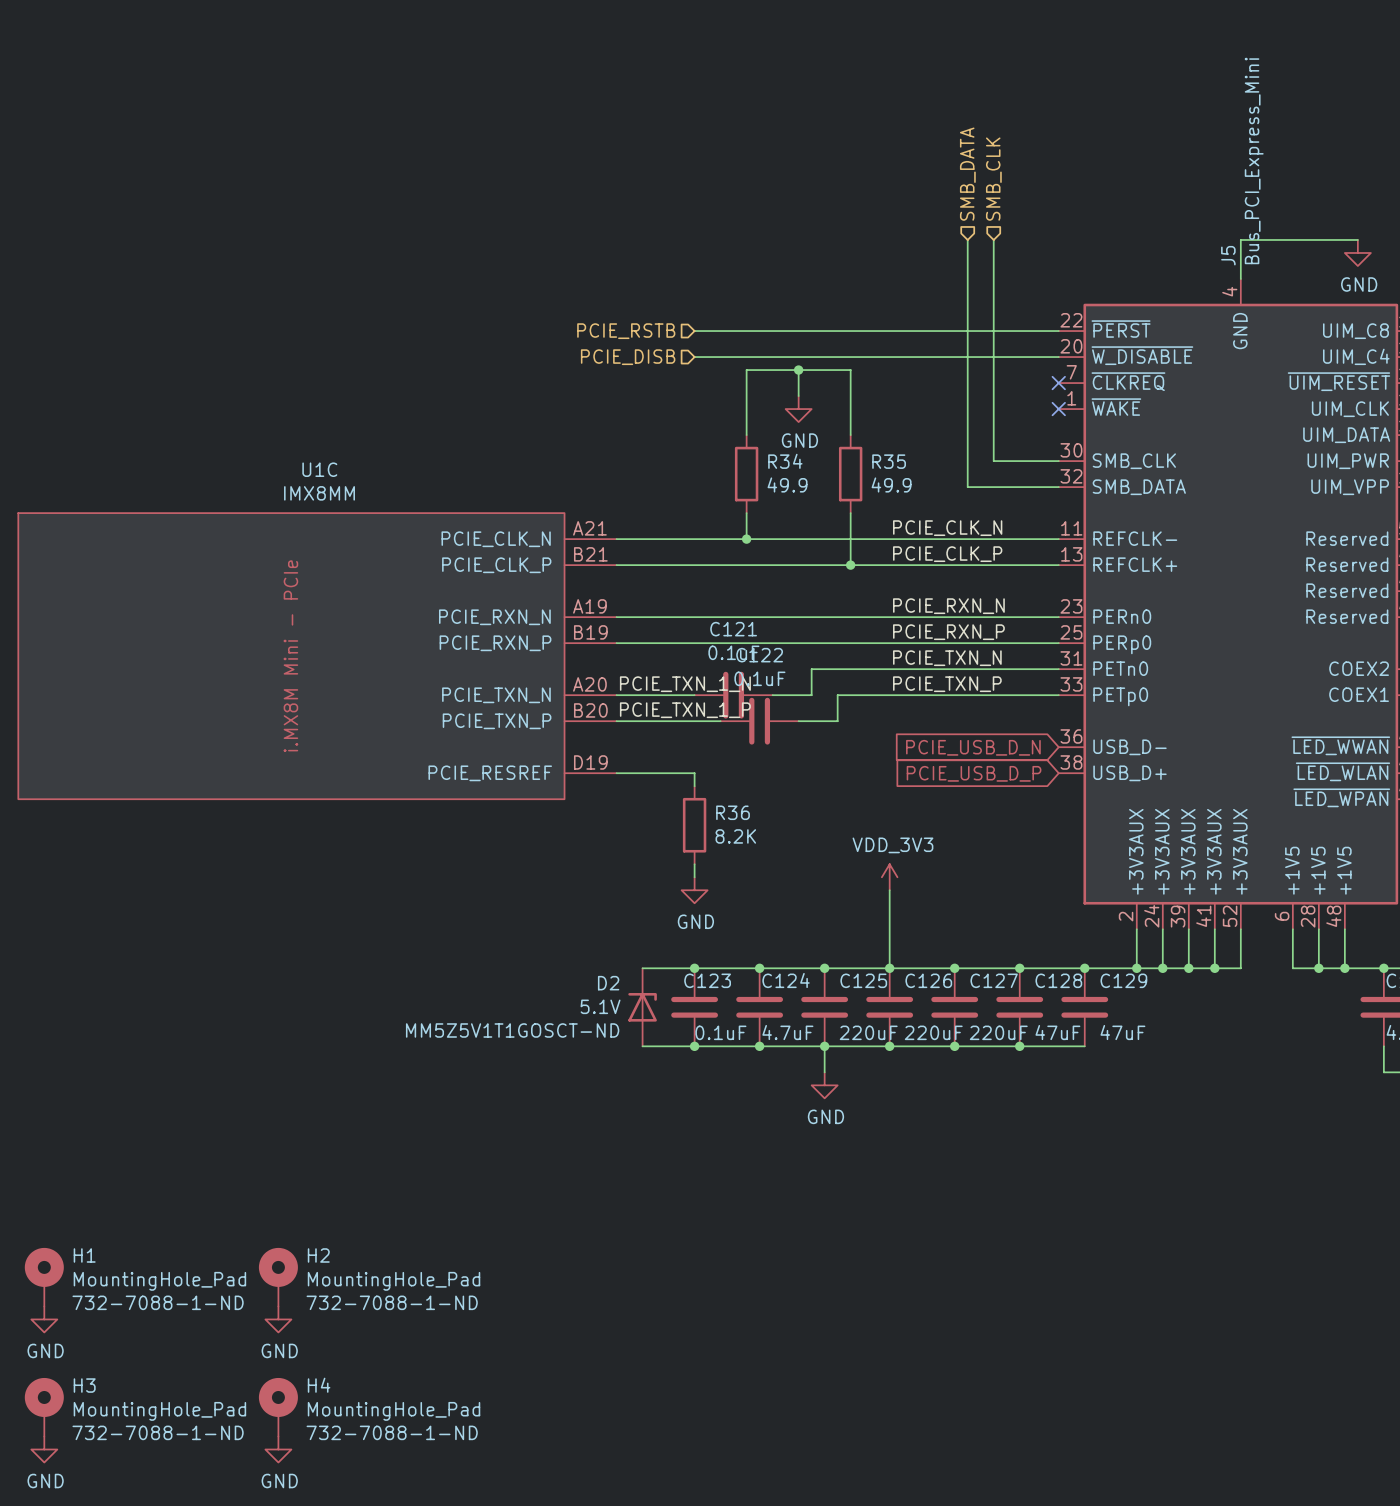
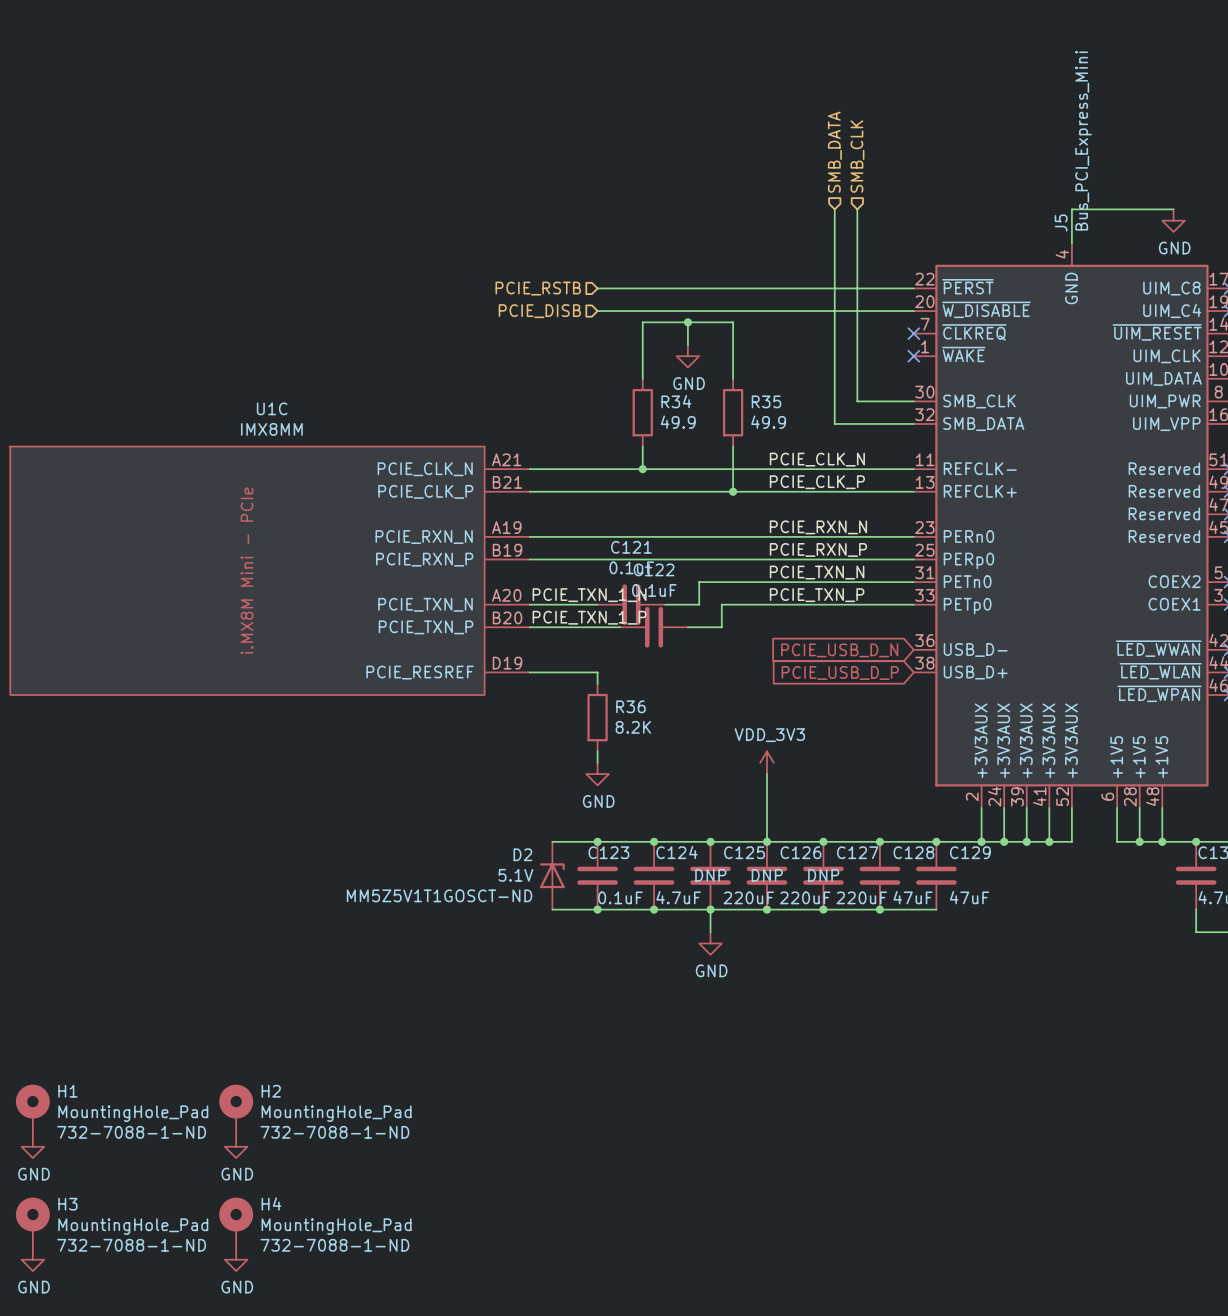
C125 text: none -> DNP (710, 875)
C126 text: none -> DNP (767, 875)
C127 text: none -> DNP (823, 875)

